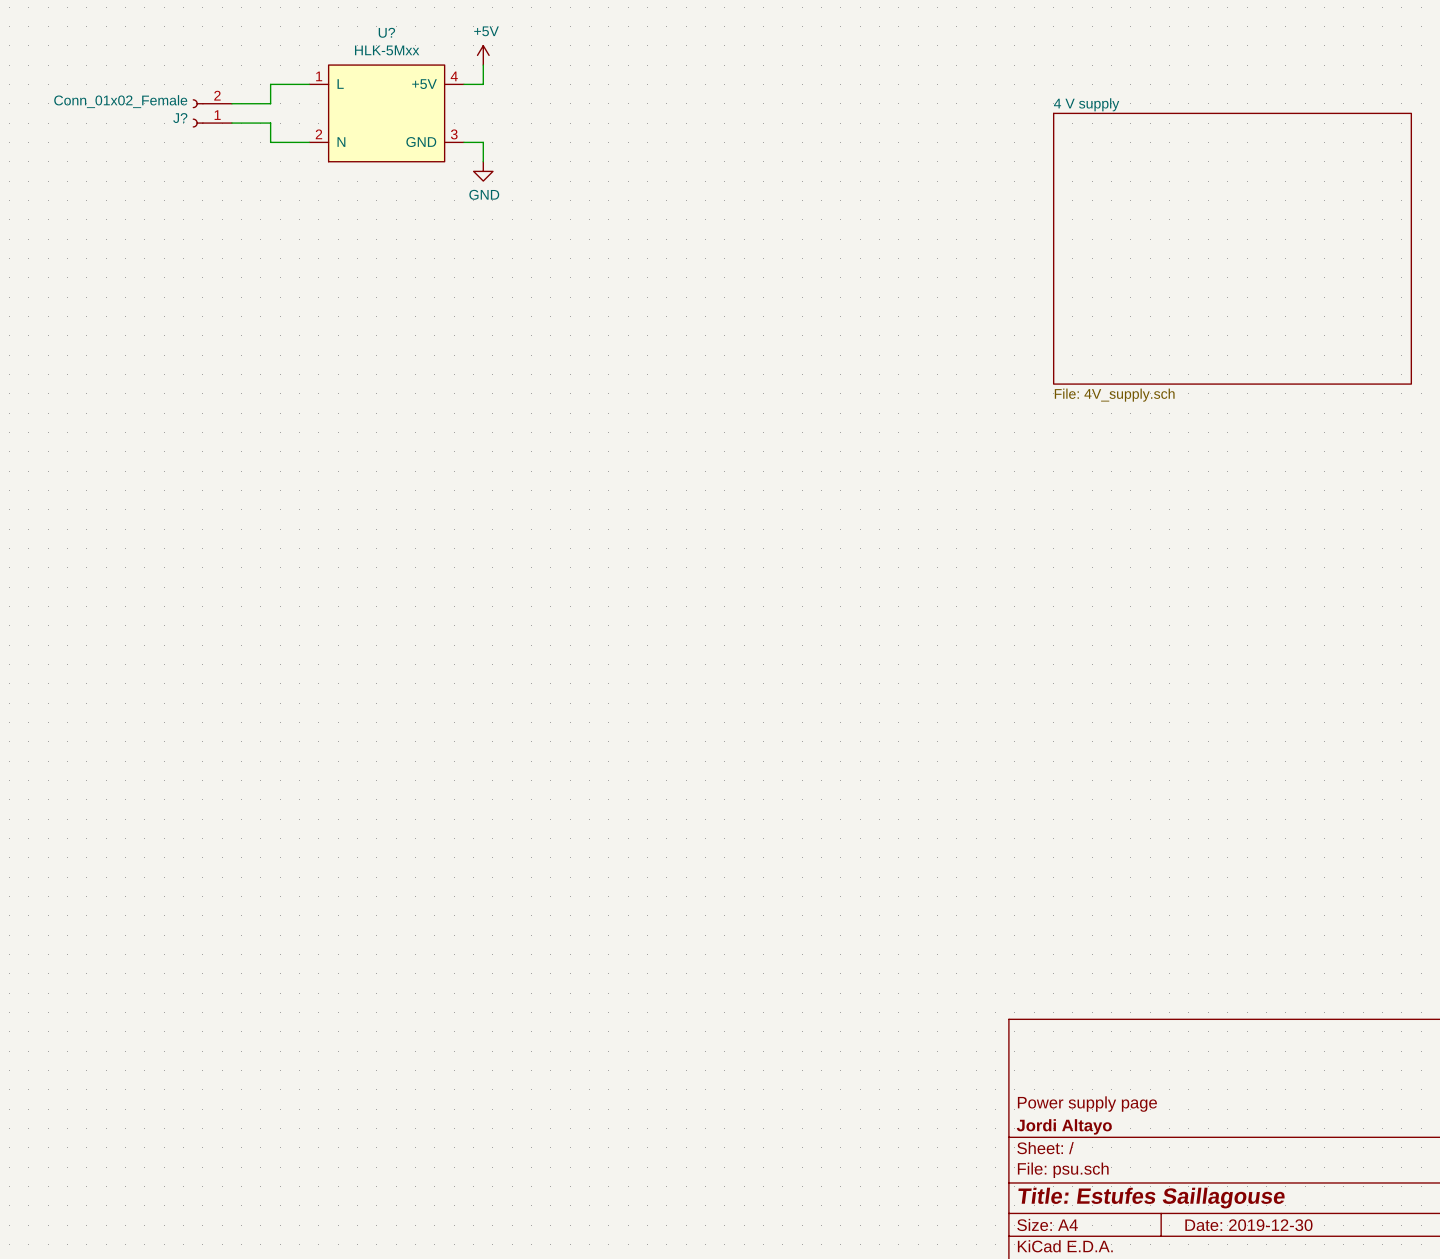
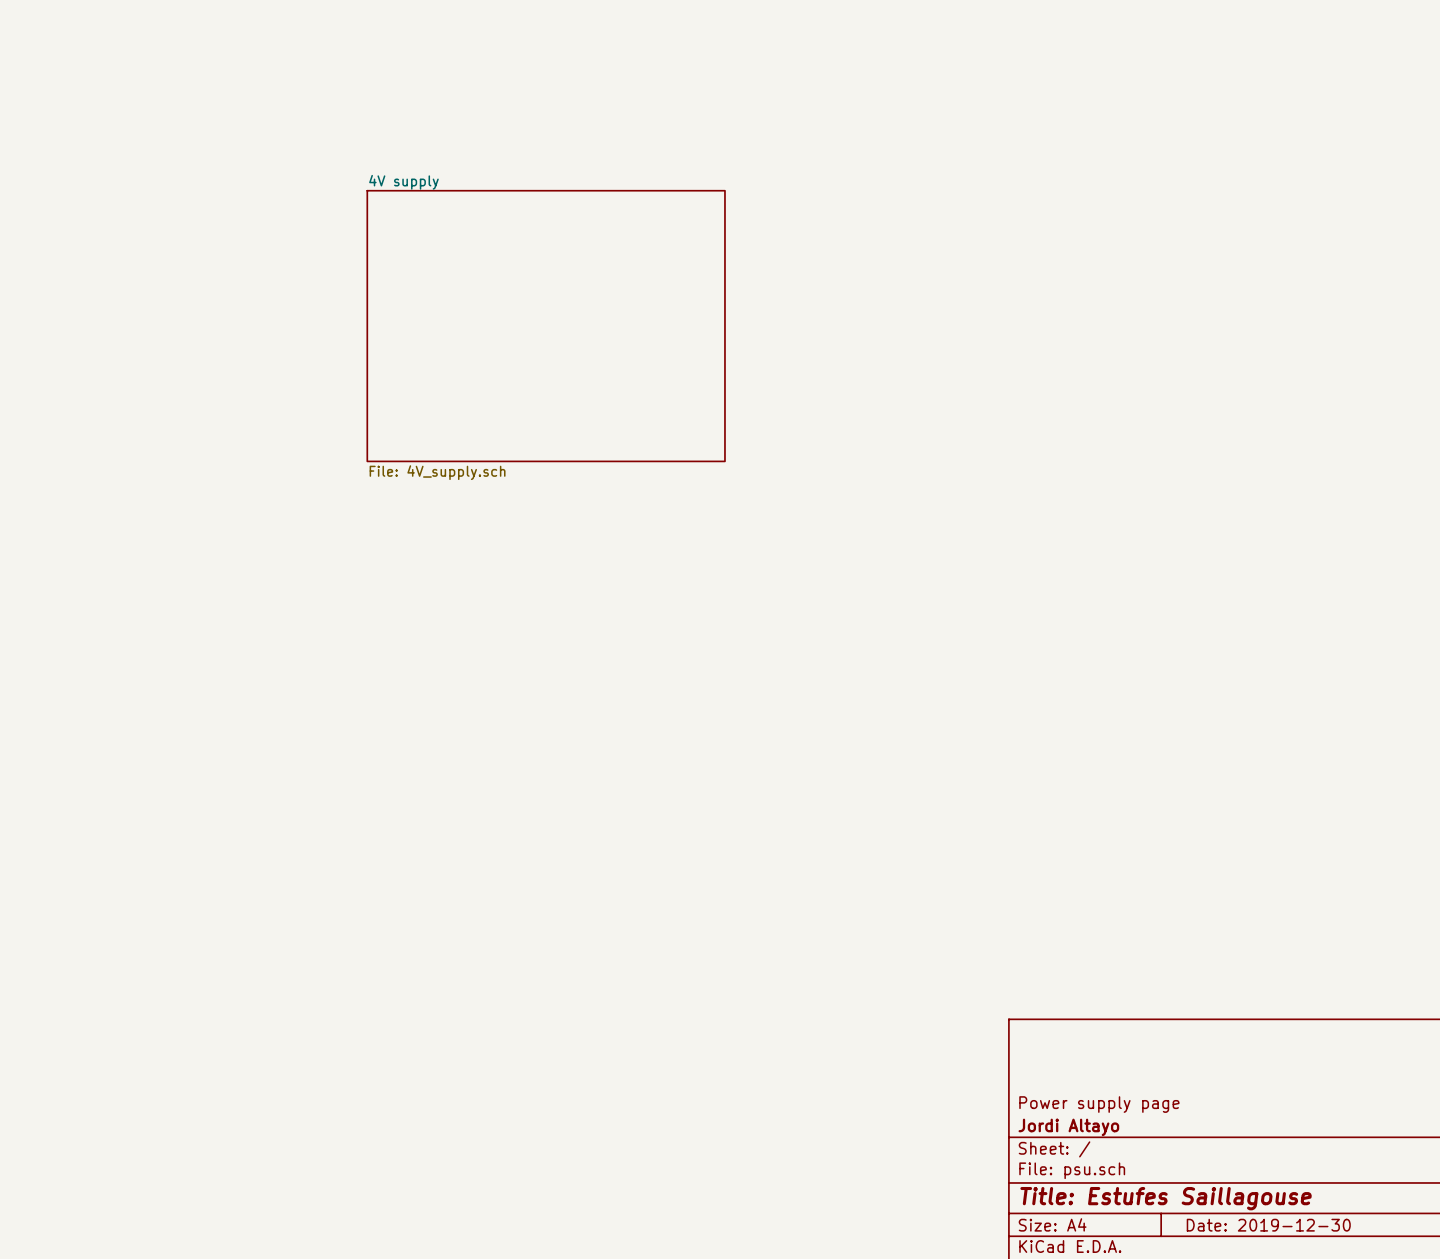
power symbol: +5V (483, 55) -> none
wire: (483, 65) (483, 84) (463, 84) -> none
wire: (309, 84) (270, 84) (270, 103) (231, 103) -> none
J?: Conn_01x02_Female (212, 113) -> none
U?: HLK-5Mxx (386, 113) -> none
wire: (231, 123) (270, 123) (270, 142) (309, 142) -> none
wire: (463, 142) (483, 142) (483, 161) -> none
power symbol: GND (483, 171) -> none
sheet 4 V supply: File: 4V_supply.sch (1232, 248) -> none
sheet 4V supply: none -> File: 4V_supply.sch (546, 326)

